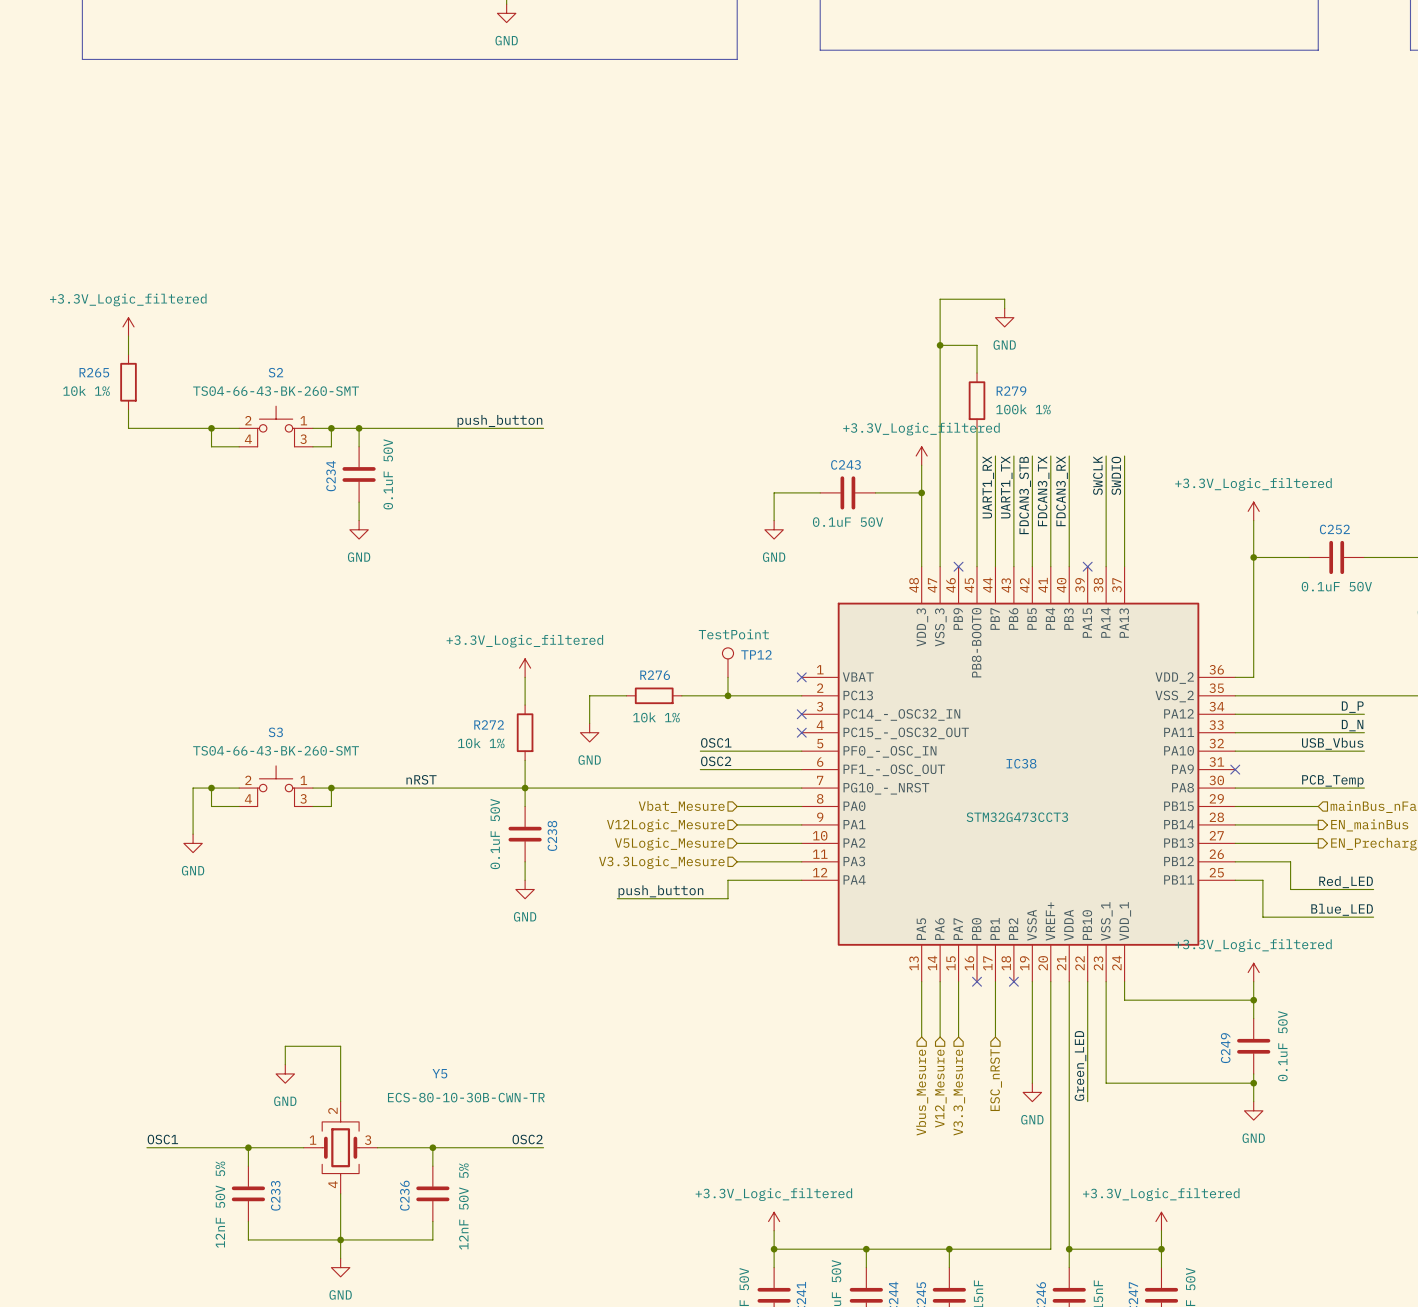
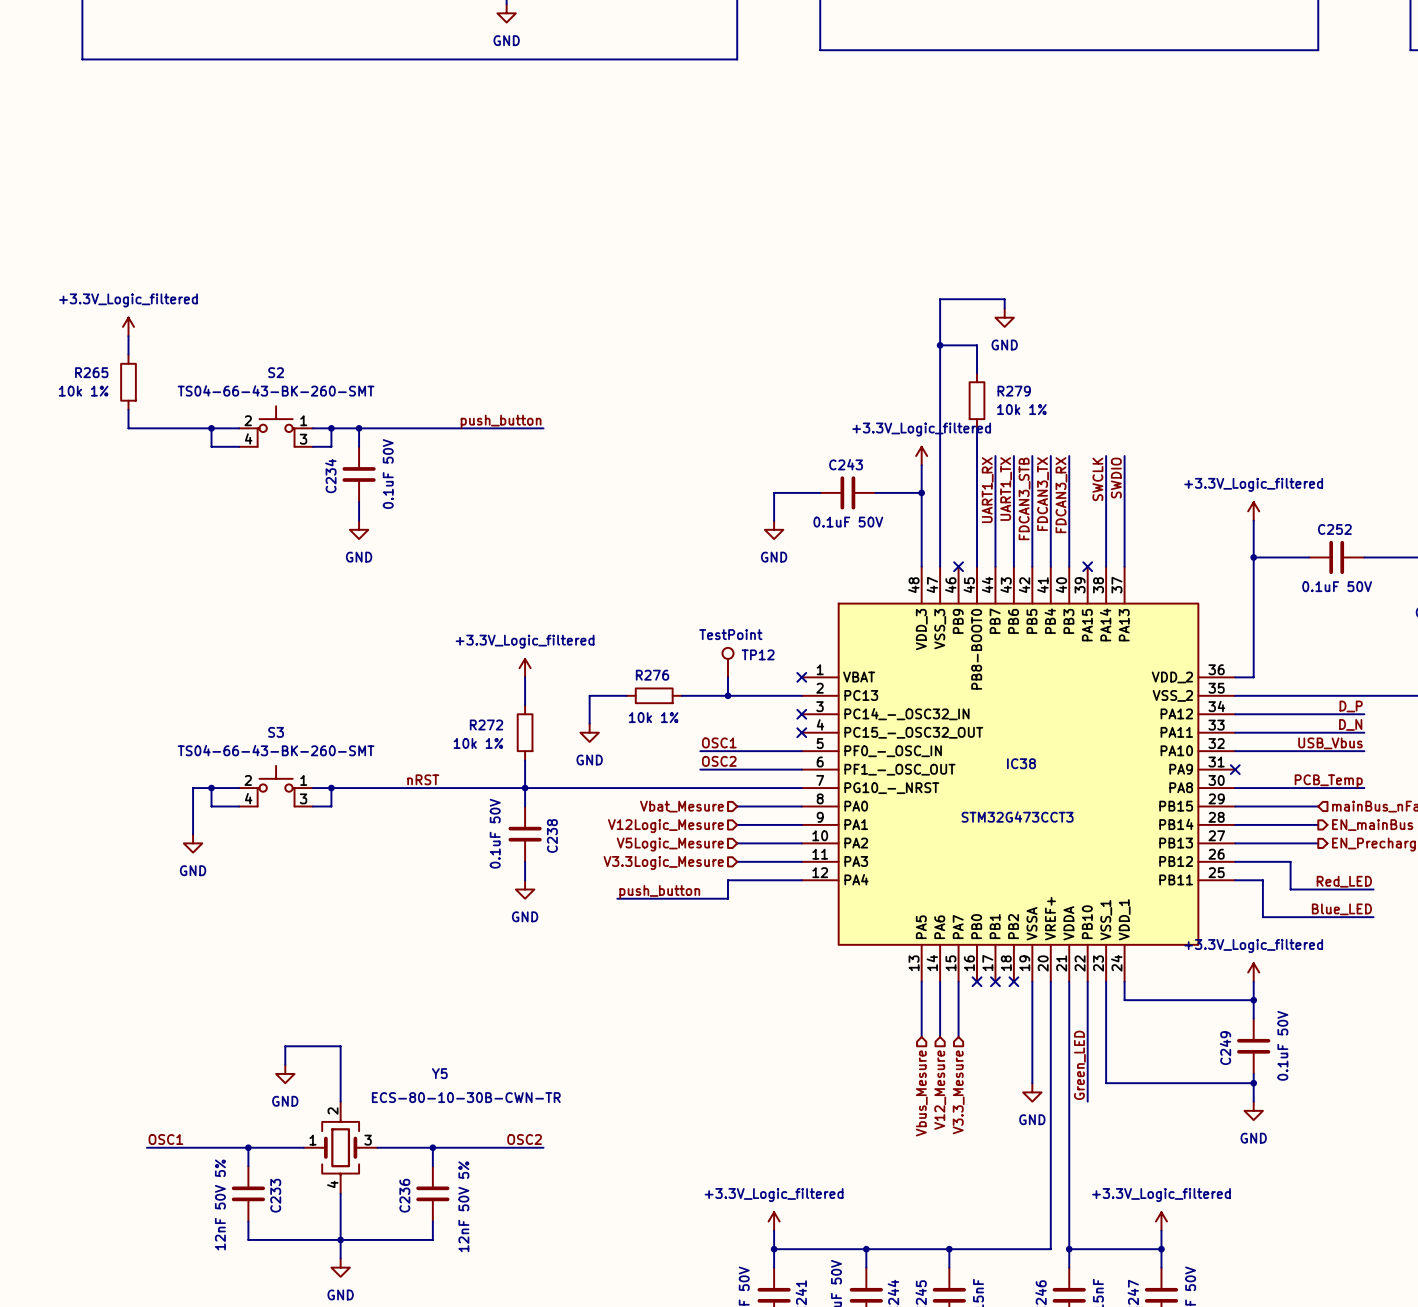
R279 value: 100k 1% (1023, 409) -> 10k 1% (1021, 409)
wire: (995, 981) (995, 1037) -> none
no-connect mark: none -> (995, 981)
hierarchical label: ESC_nRST (996, 1080) -> none

